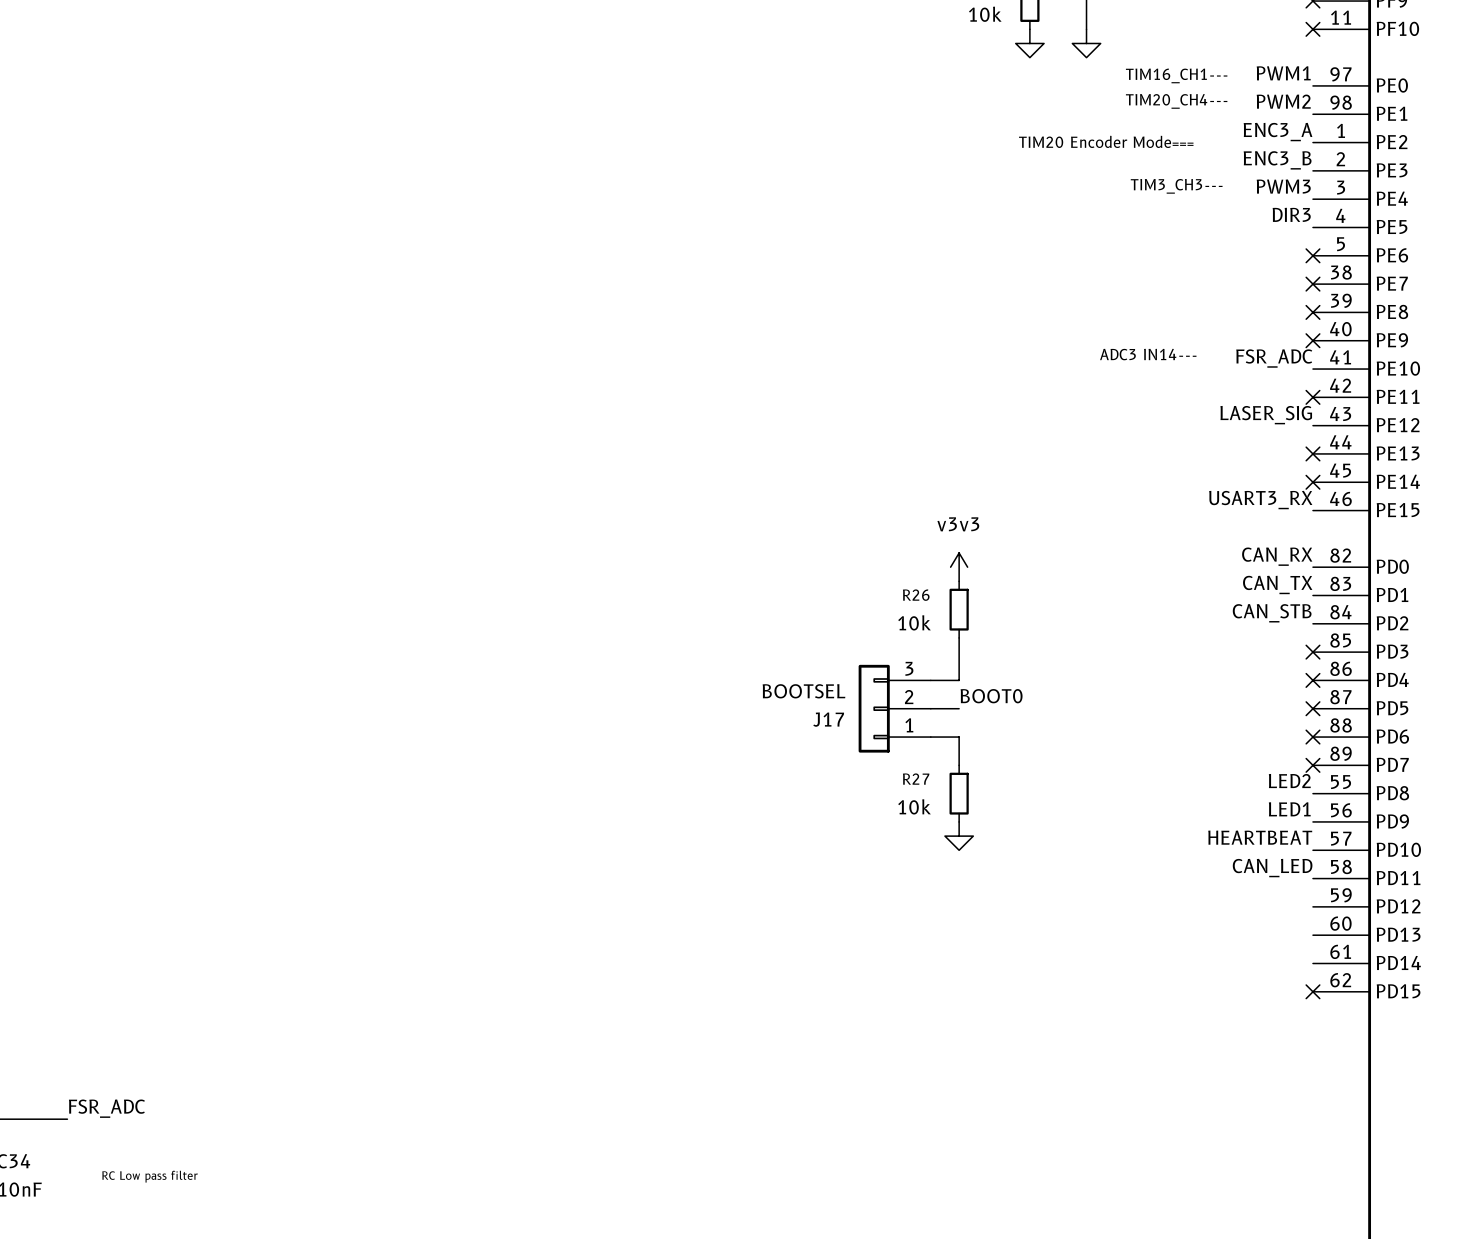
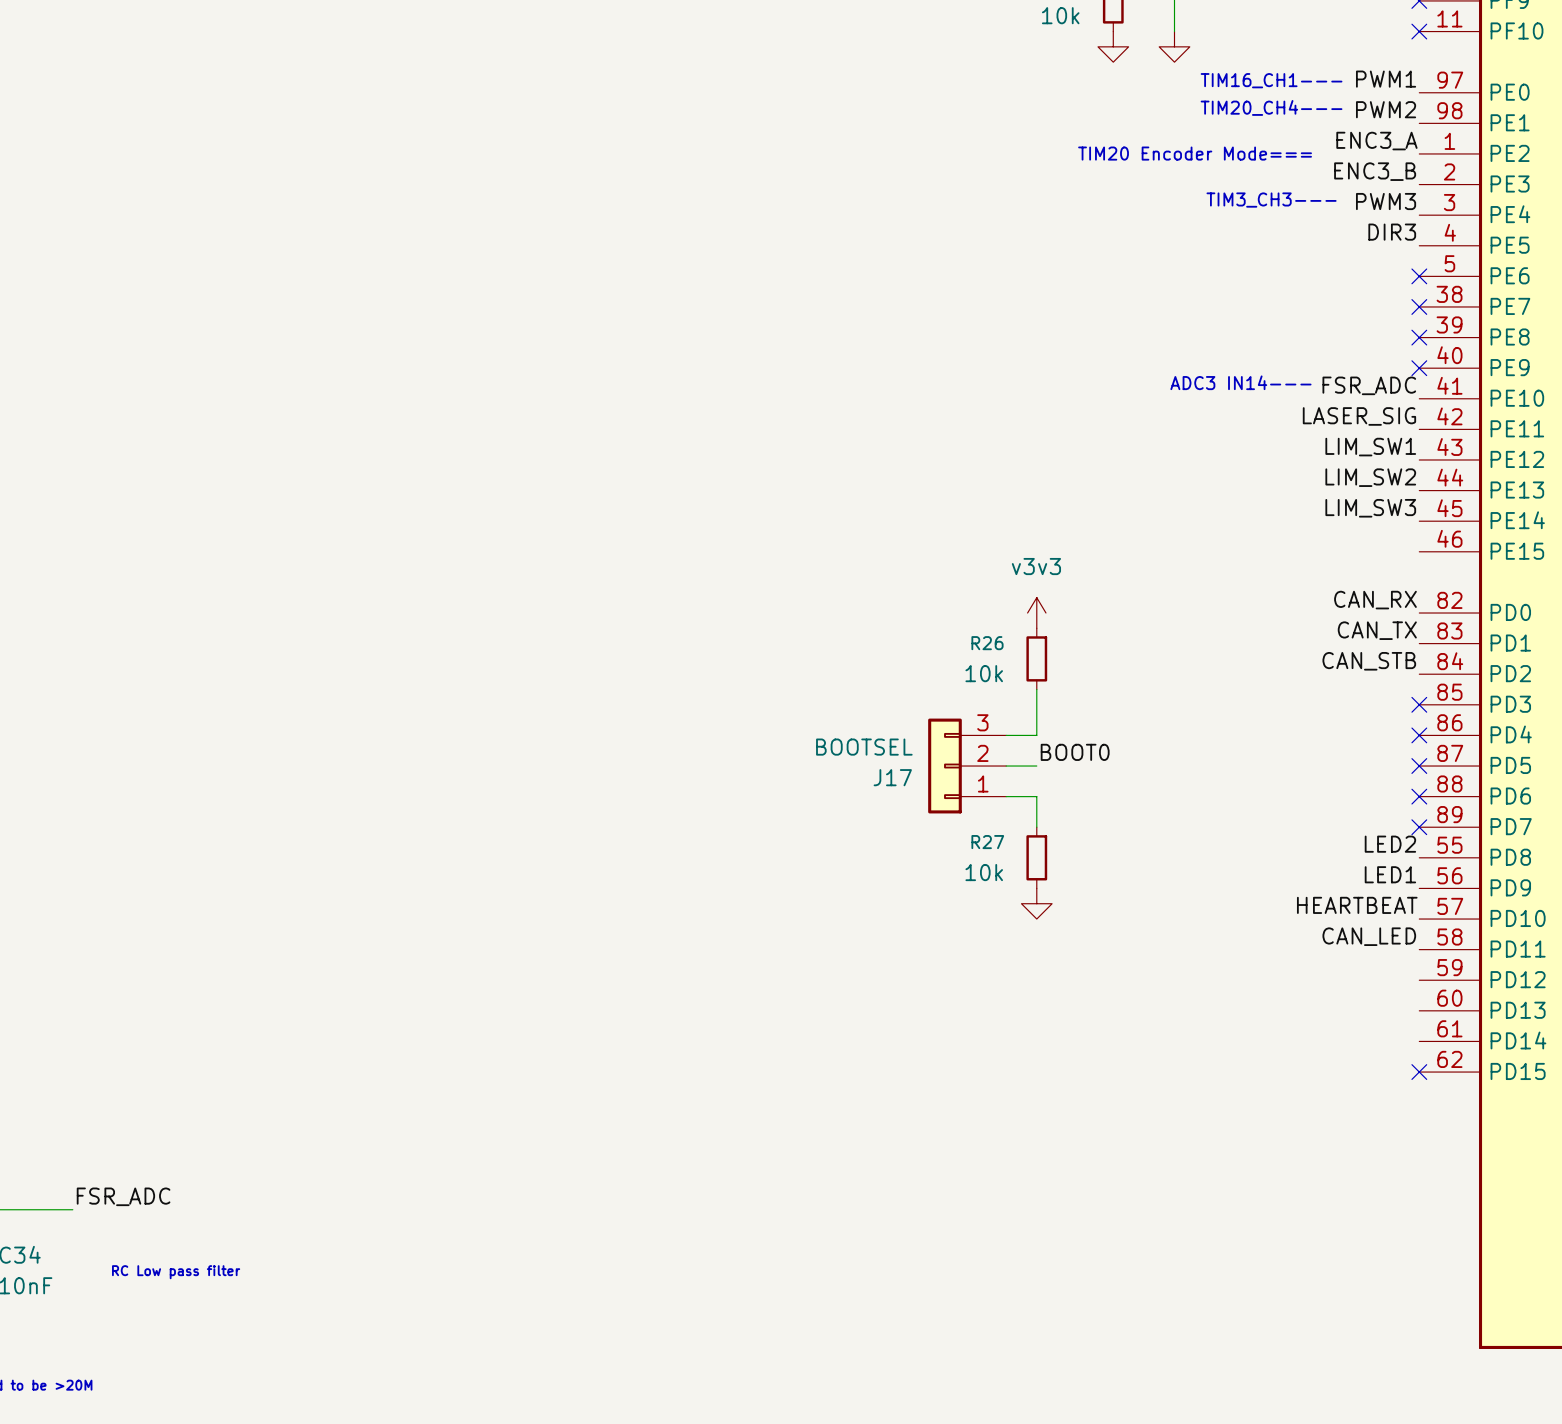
label: none -> LASER_SIG (1359, 416)
no-connect mark: (1312, 397) -> none
label: LASER_SIG (1266, 415) -> LIM_SW1 (1370, 447)
label: none -> LIM_SW2 (1370, 477)
no-connect mark: (1312, 453) -> none
label: none -> LIM_SW3 (1370, 508)
no-connect mark: (1312, 482) -> none
label: USART3_RX (1260, 500) -> none

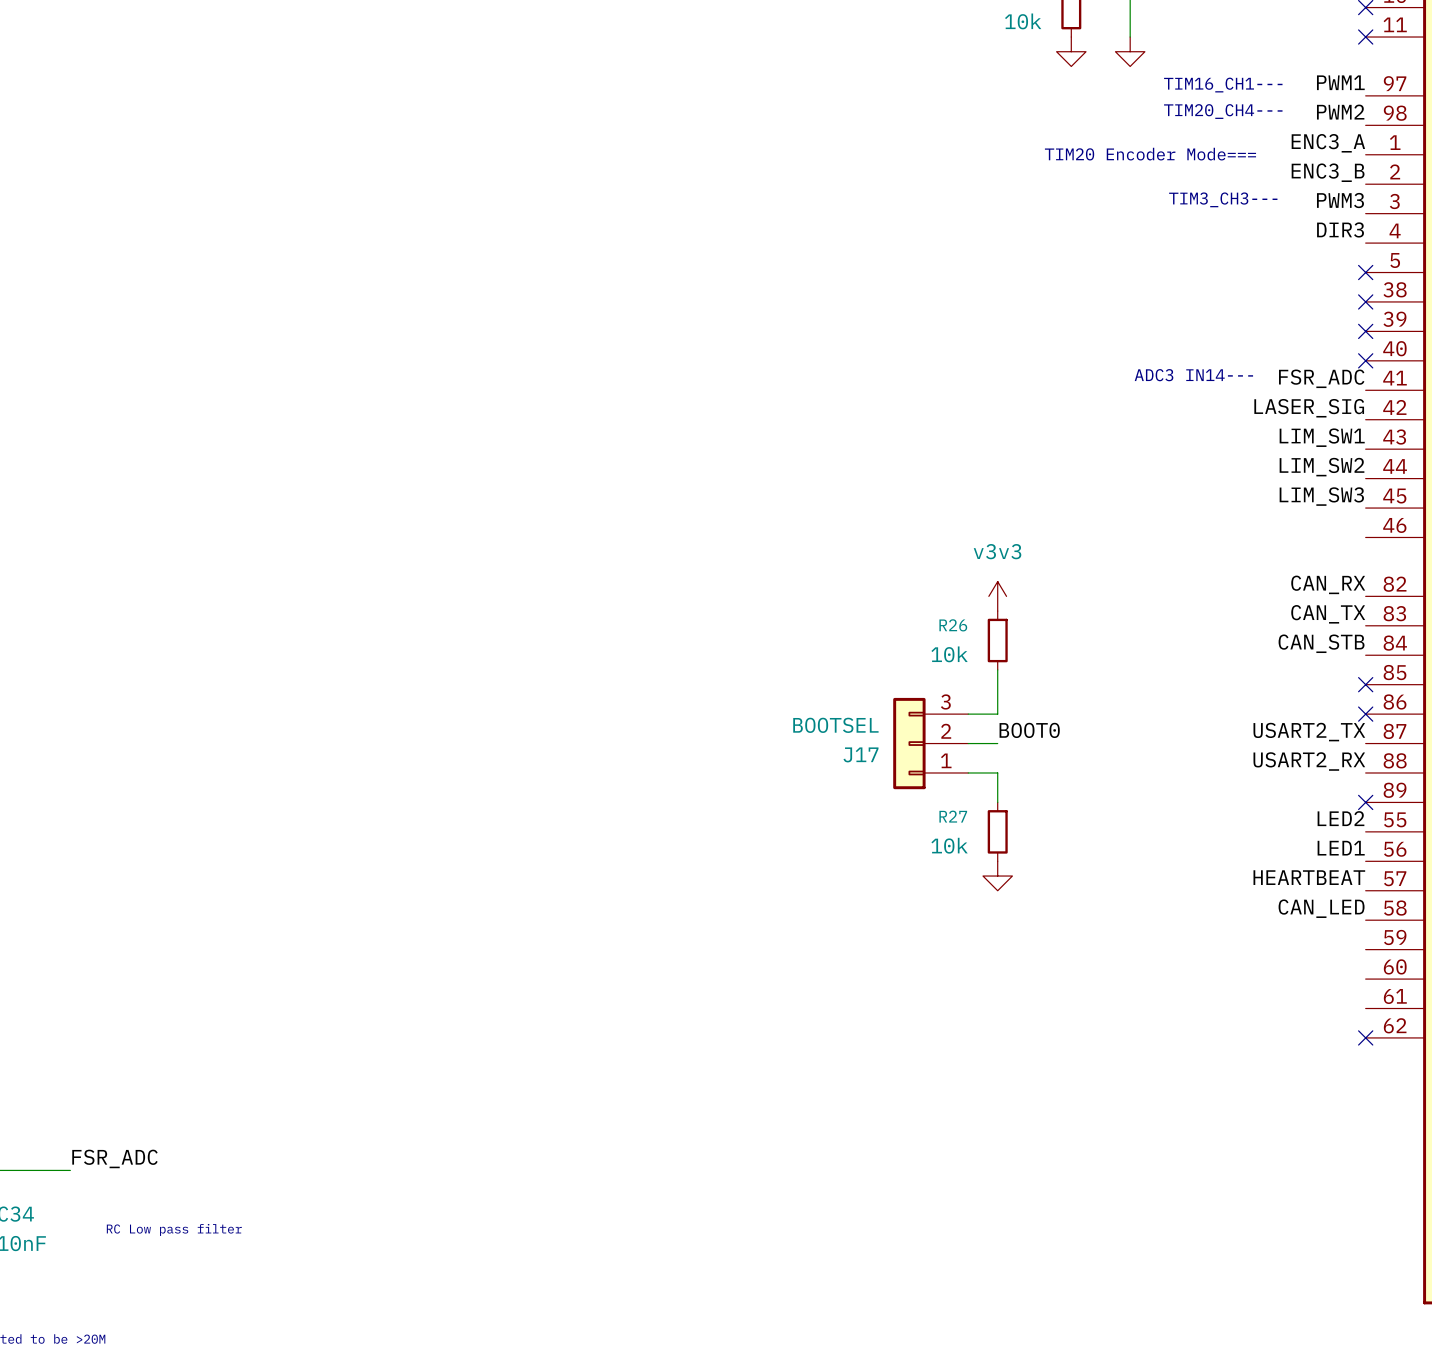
label: none -> USART2_TX (1309, 732)
no-connect mark: (1419, 766) -> none
label: none -> USART2_RX (1309, 761)
no-connect mark: (1419, 796) -> none

